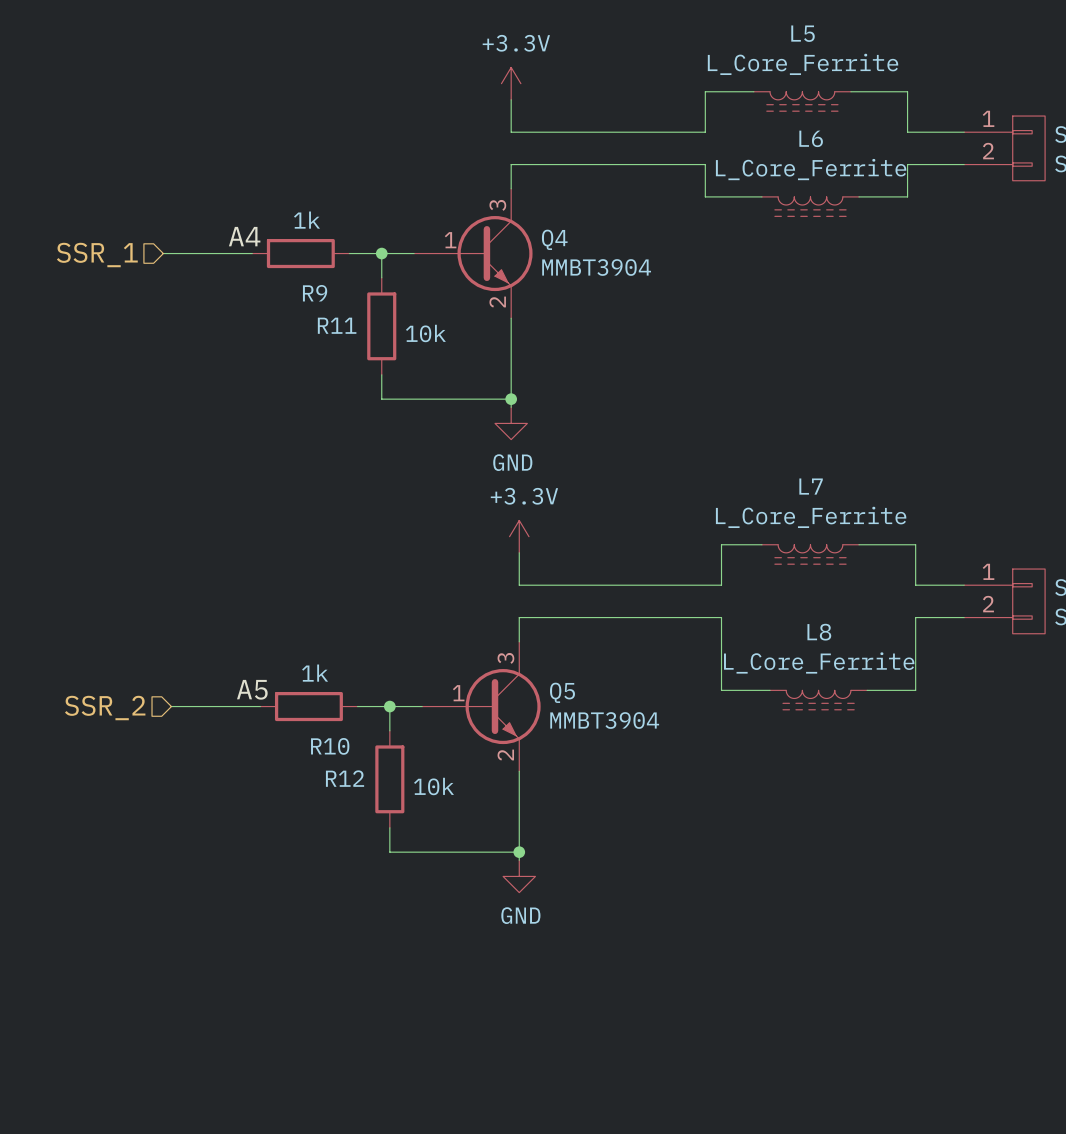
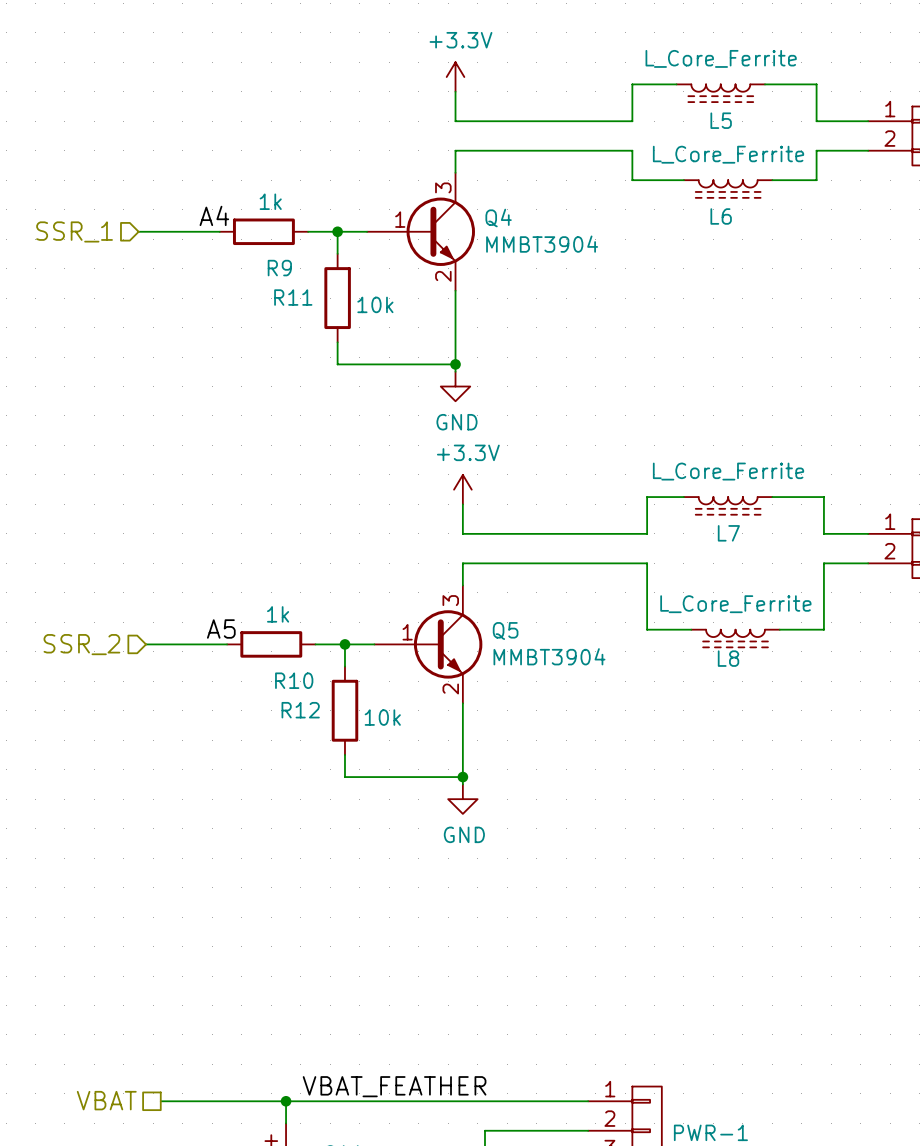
L5 name position: L5 (803, 33) -> L5 (721, 120)
L6 name position: L6 (811, 138) -> L6 (721, 216)
L7 name position: L7 (811, 486) -> L7 (728, 533)
L8 name position: L8 (819, 632) -> L8 (728, 658)

